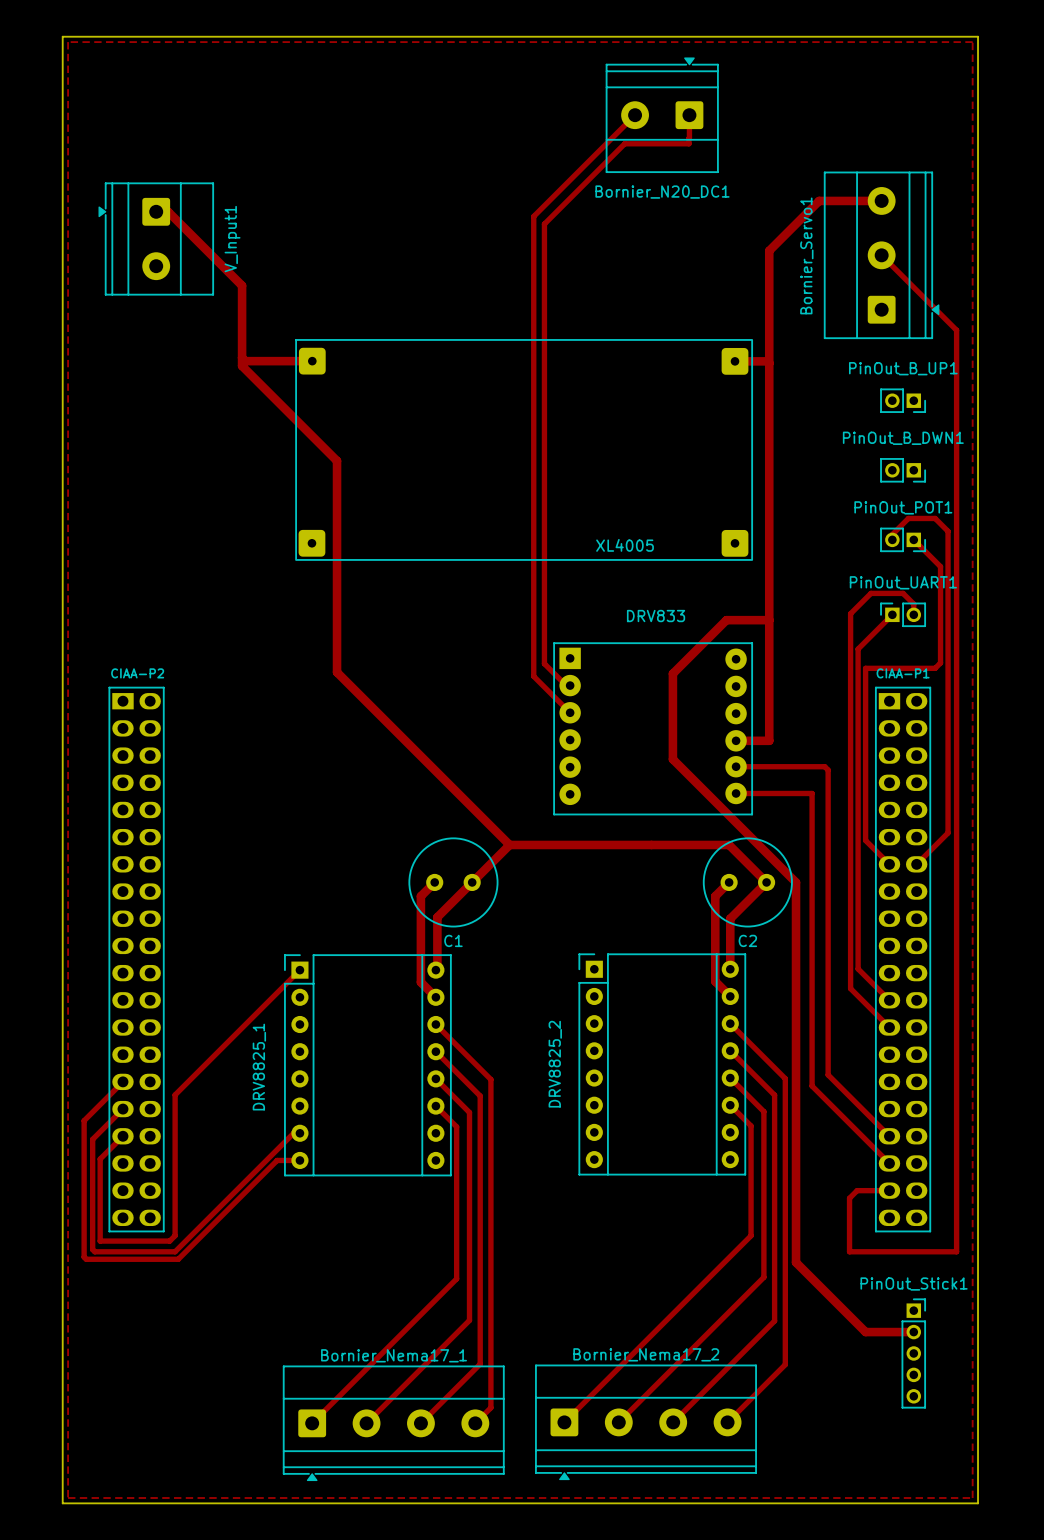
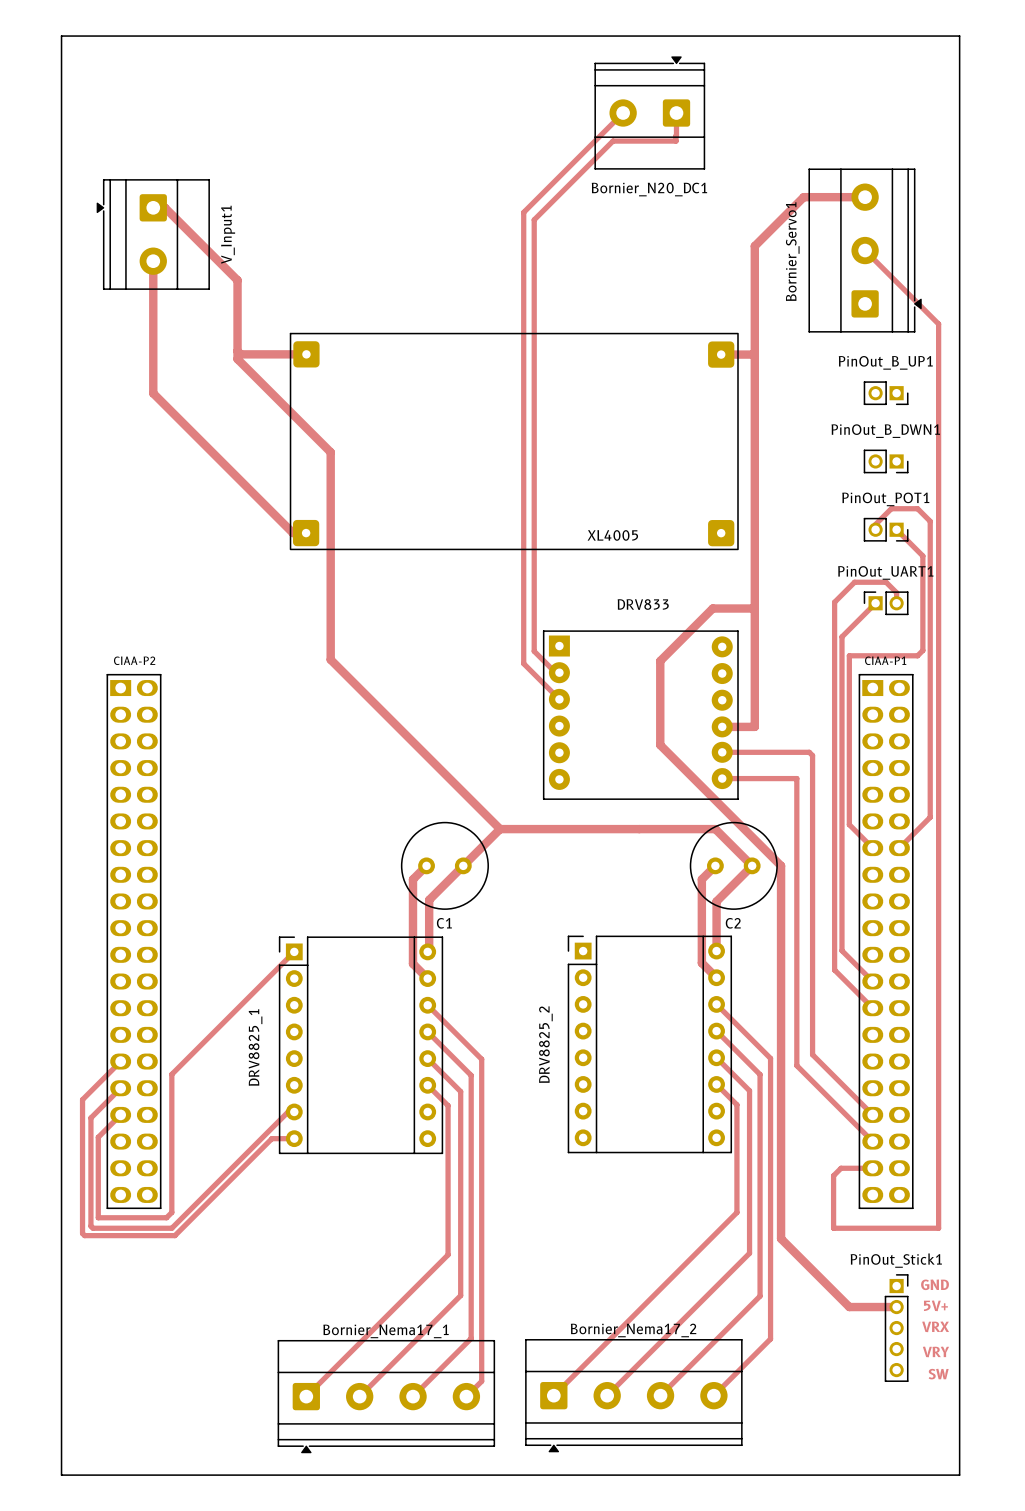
zone outline: (68, 42) (68, 1498) (972, 1498) (972, 42) (68, 42) -> none
track: none -> (153, 261) (153, 393) (292, 533) (306, 533)
text: none -> GND (935, 1284)
text: none -> 5V+ (935, 1305)
text: none -> VRX (935, 1326)
text: none -> VRY (935, 1351)
text: none -> SW (938, 1374)

